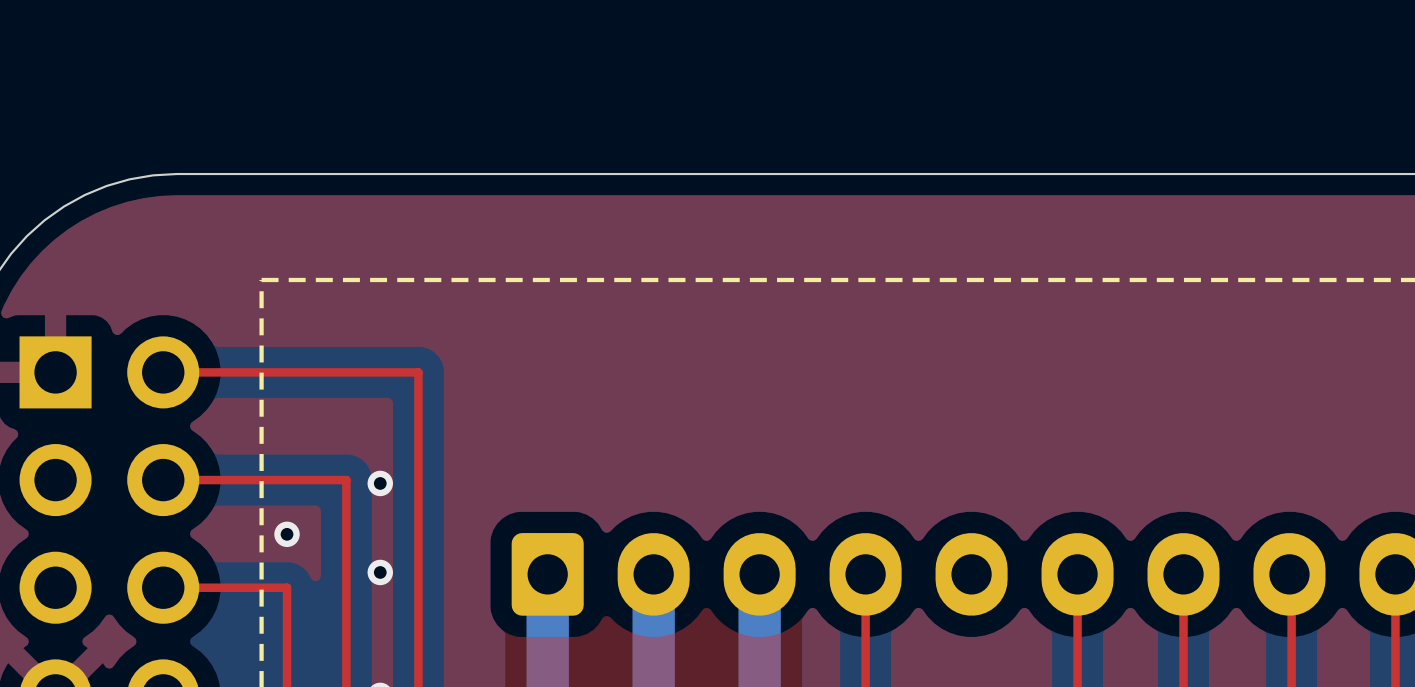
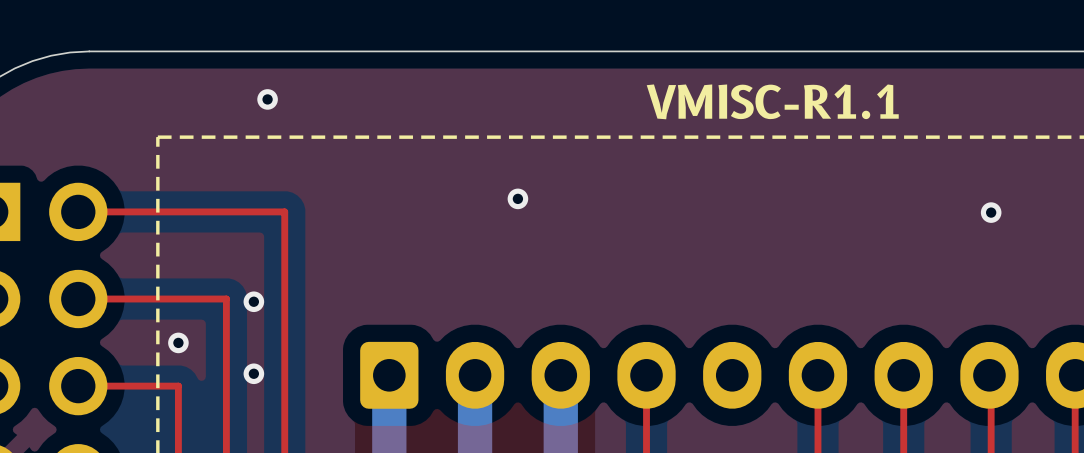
via: none -> (267, 99)
text: none -> VMISC-R1.1 (772, 101)
via: none -> (517, 198)
via: none -> (991, 212)

